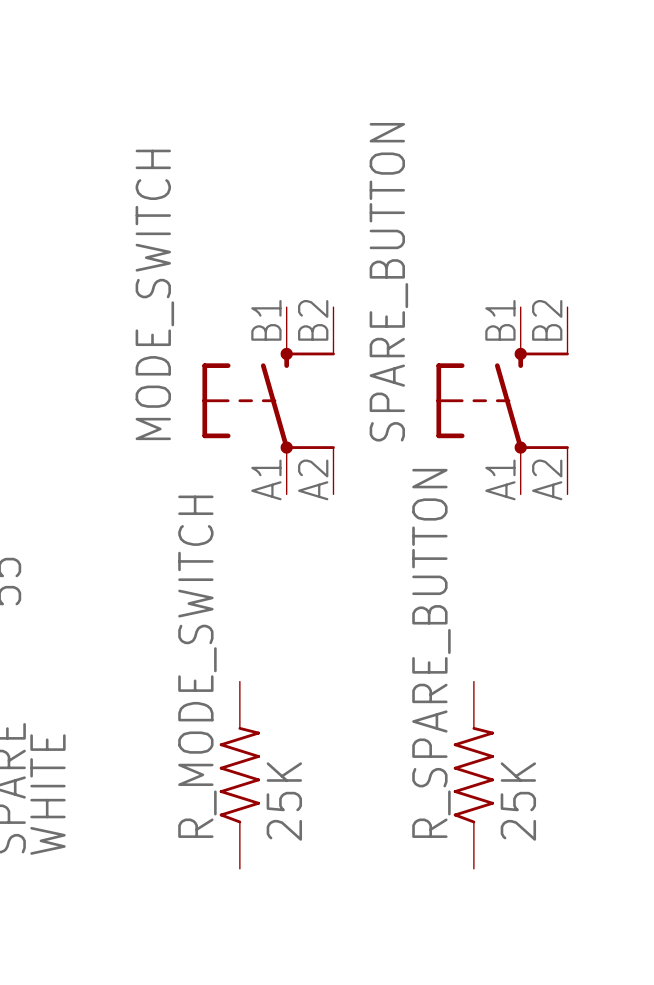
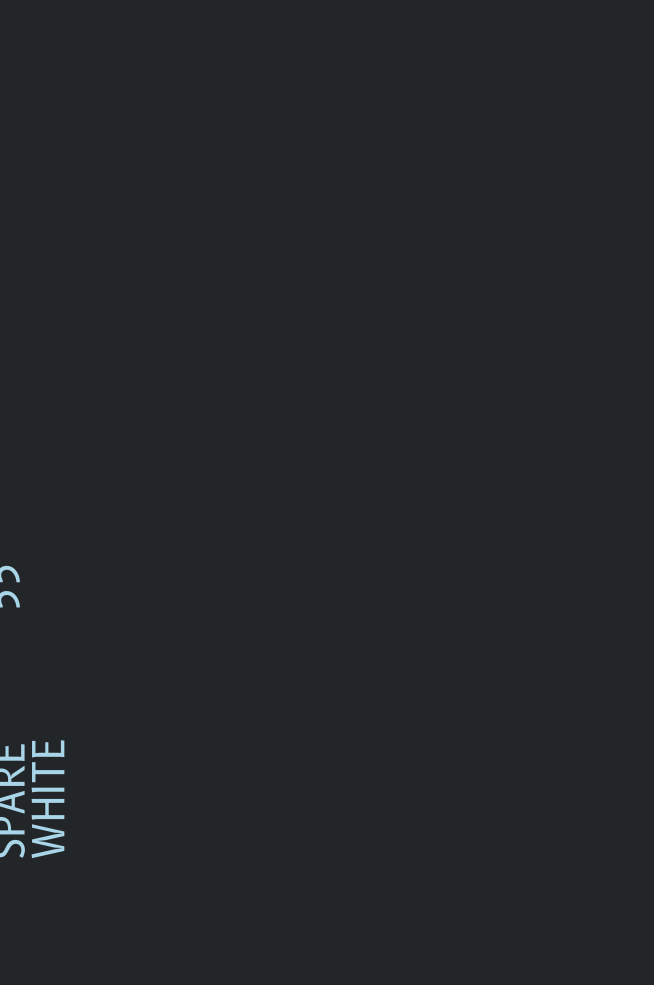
MODE_SWITCH: (268, 400) -> none
SPARE_BUTTON: (502, 400) -> none
R_MODE_SWITCH: 25K (239, 775) -> none
R_SPARE_BUTTON: 25K (473, 775) -> none

